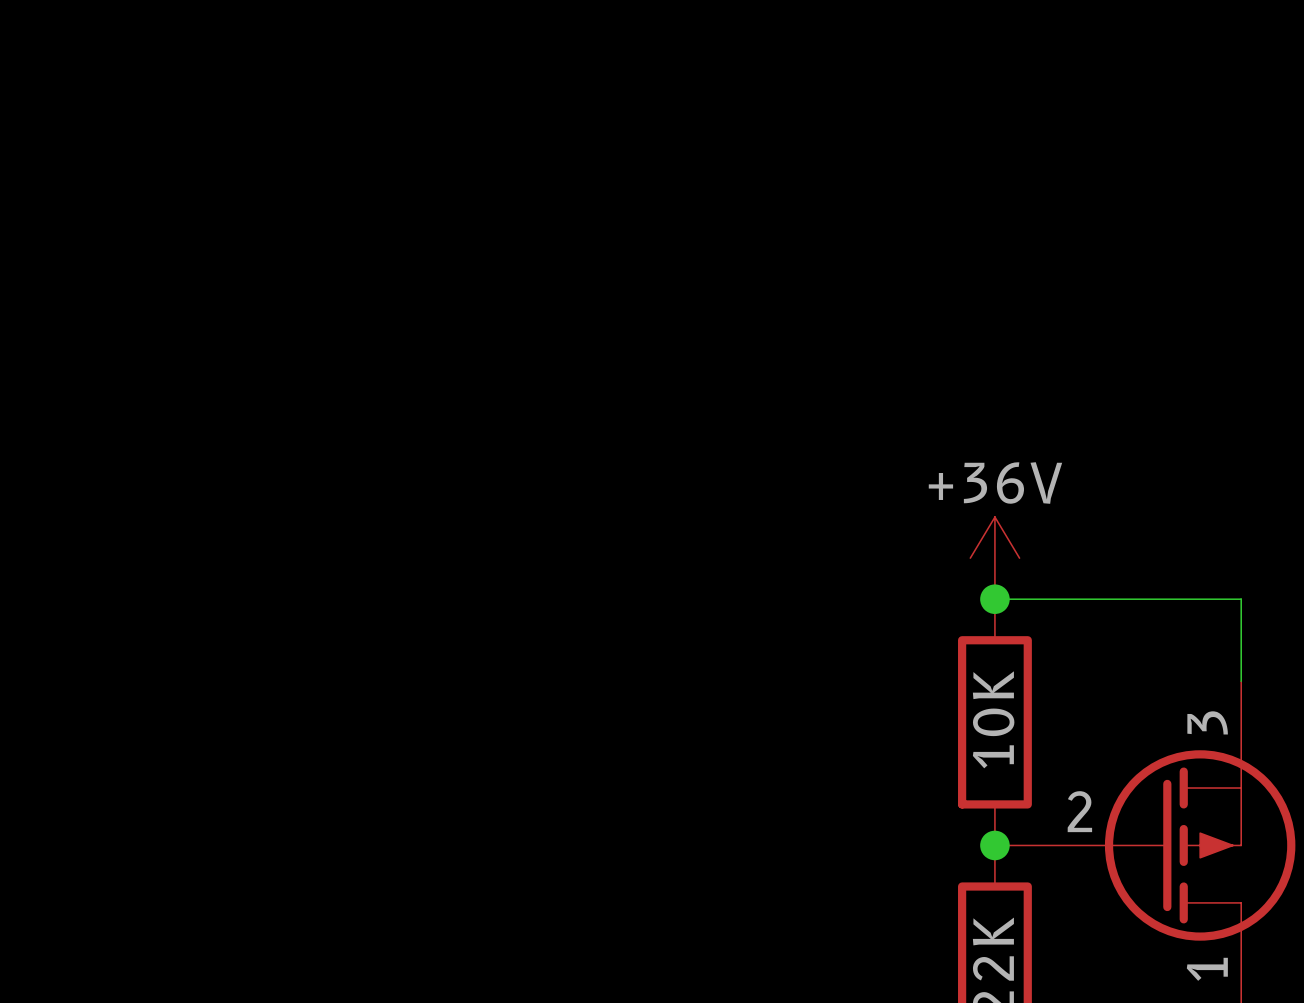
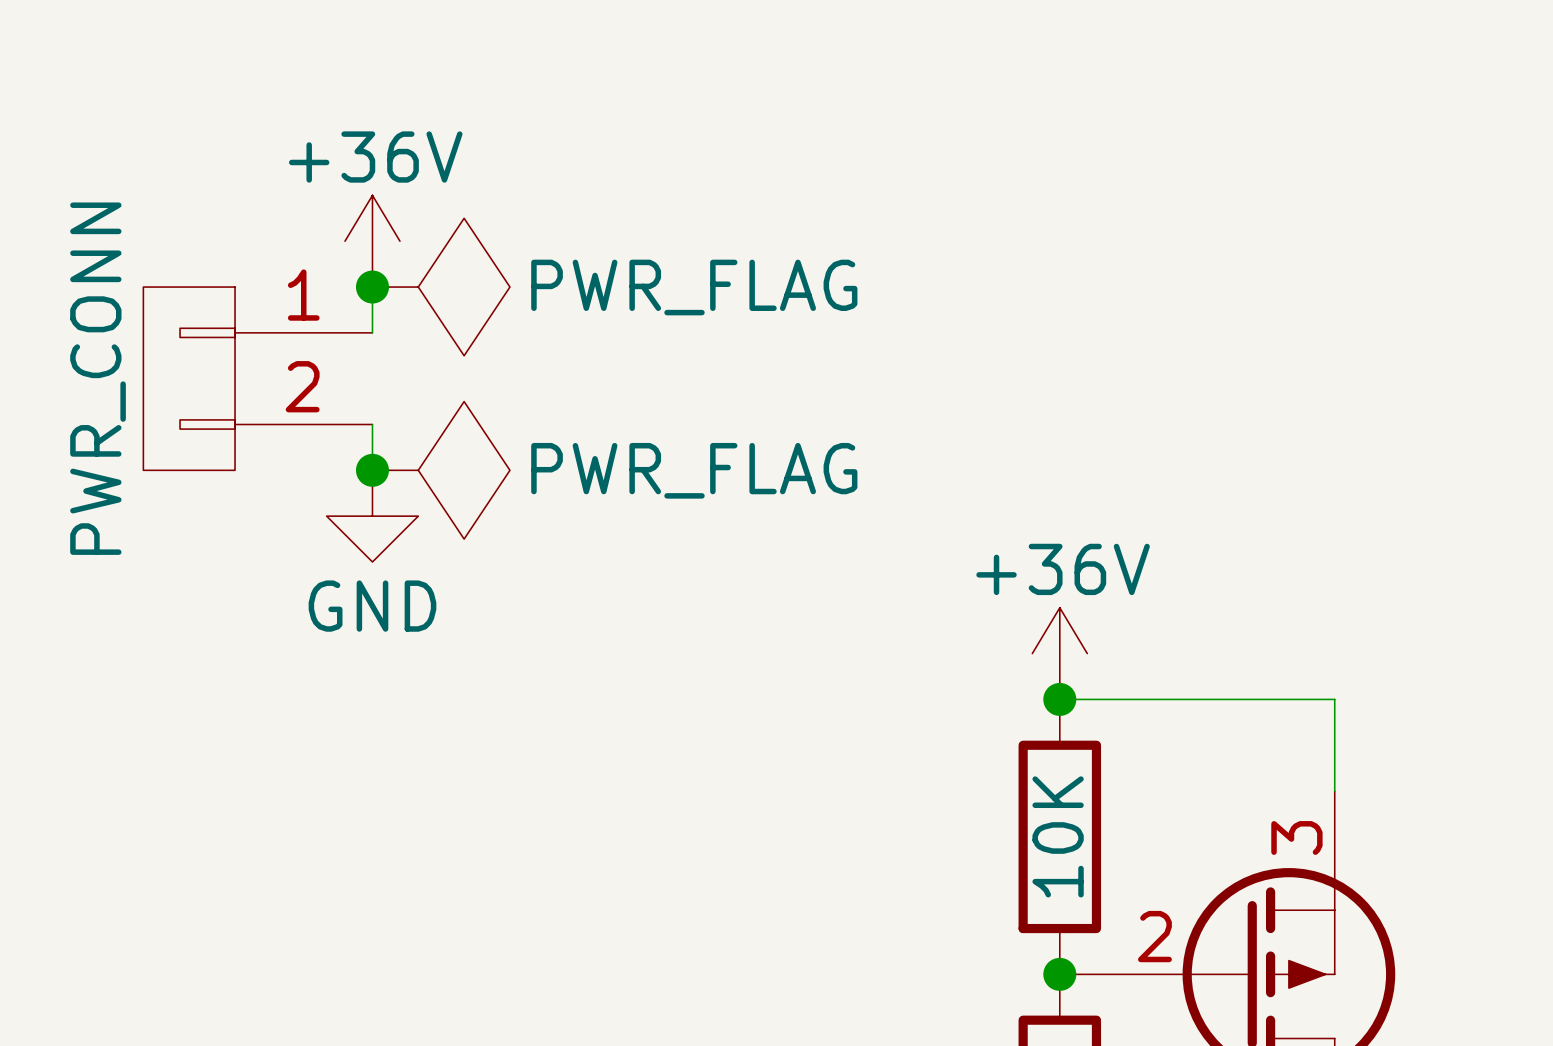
power symbol: none -> +36V (372, 241)
wire: none -> (372, 287) (372, 332)
junction: none -> (372, 287)
power symbol: none -> PWR_FLAG (441, 287)
part: none -> PWR_CONN (257, 378)
wire: none -> (372, 424) (372, 470)
junction: none -> (372, 470)
power symbol: none -> PWR_FLAG (441, 470)
power symbol: none -> GND (372, 516)

